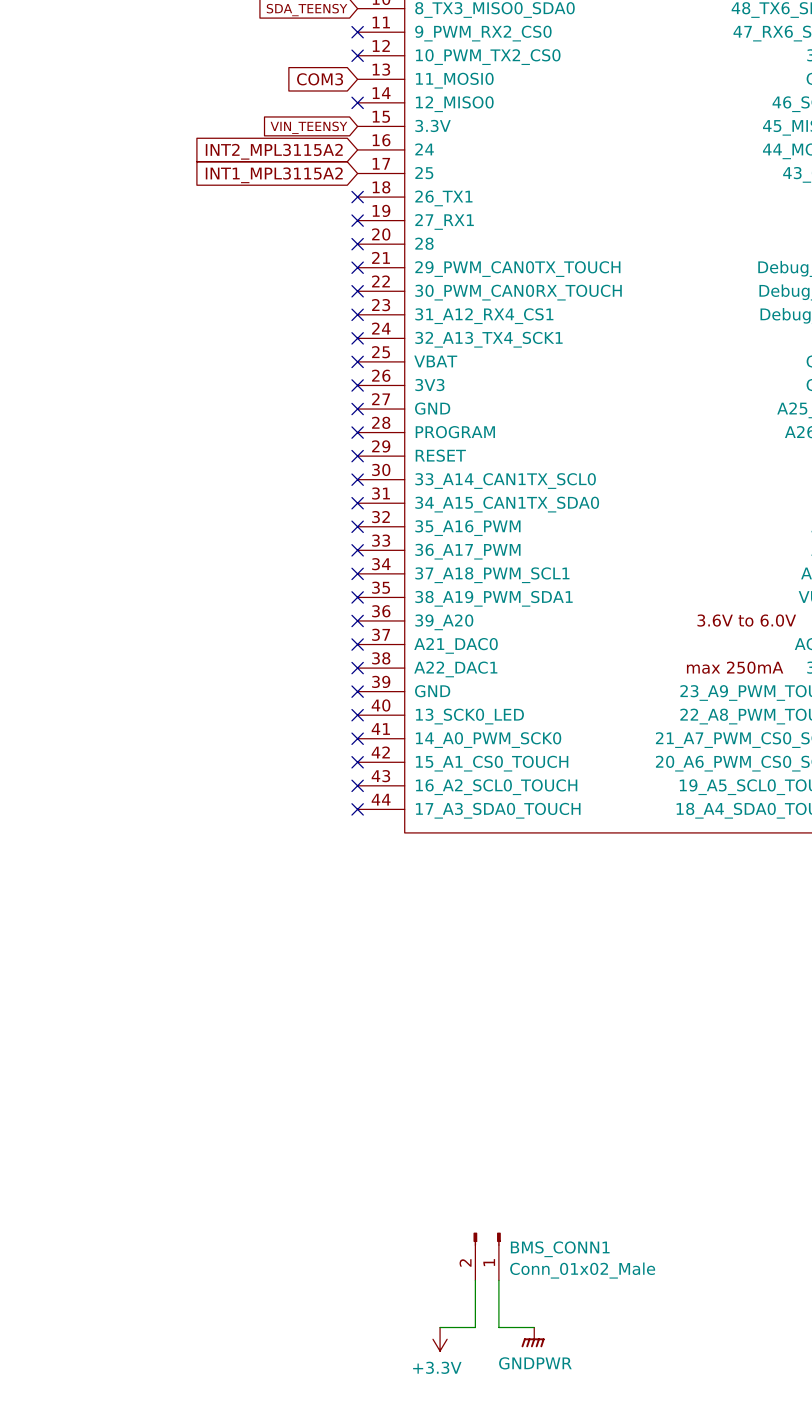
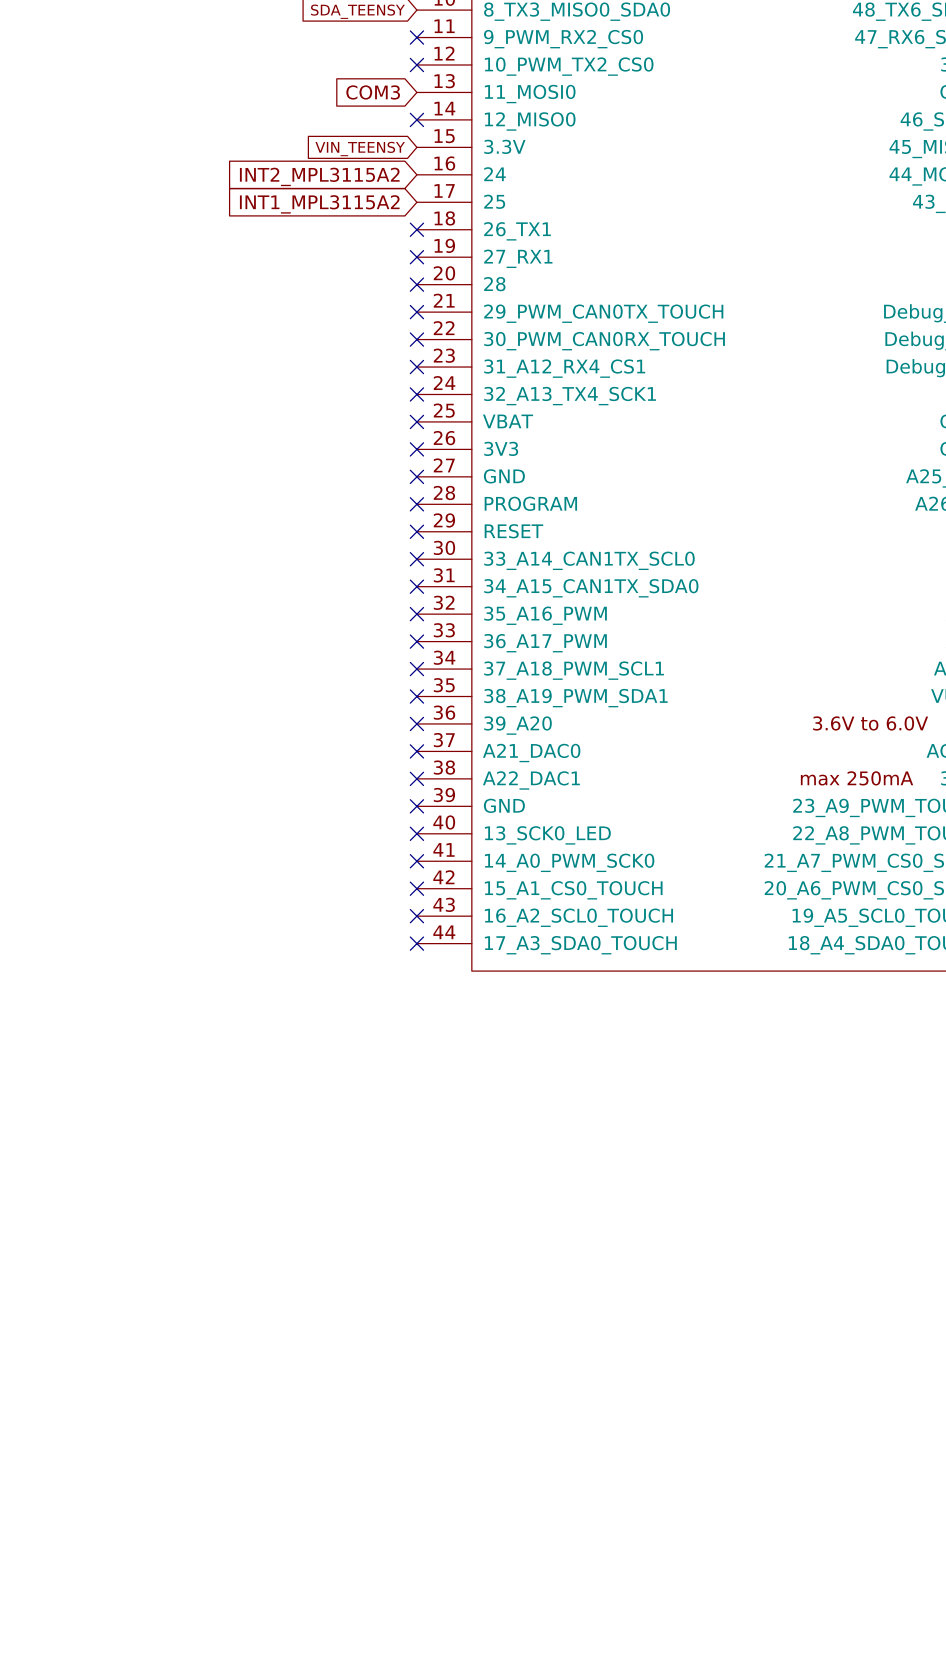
BMS_CONN1: Conn_01x02_Male (487, 1256) -> none
wire: (475, 1280) (475, 1327) (440, 1327) -> none
wire: (498, 1280) (498, 1327) (534, 1327) -> none
power symbol: GNDPWR (533, 1337) -> none
power symbol: +3.3V (440, 1339) -> none

